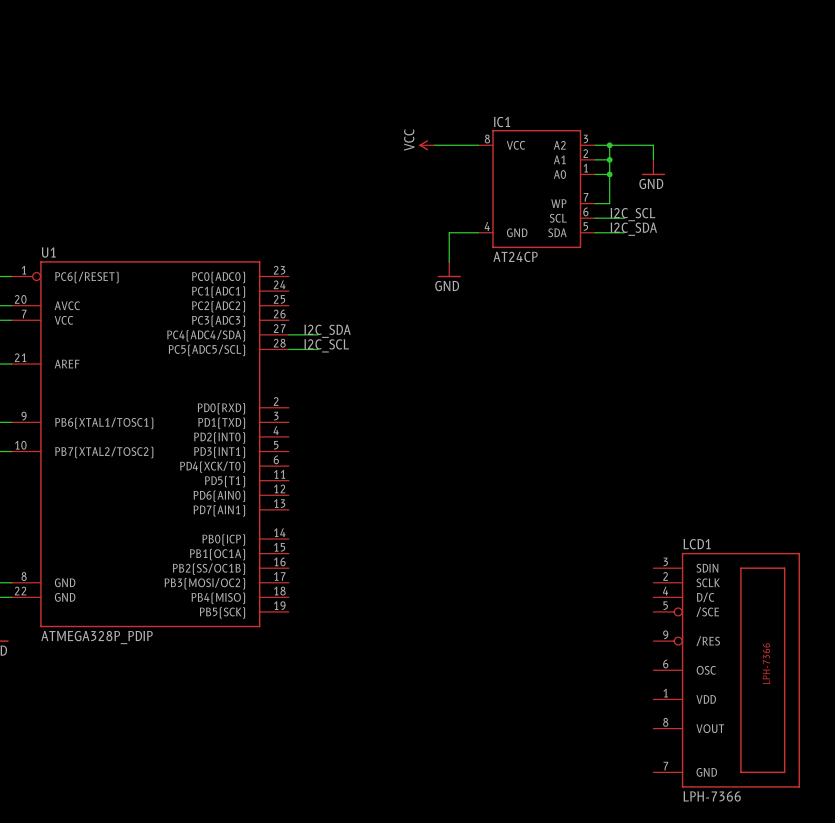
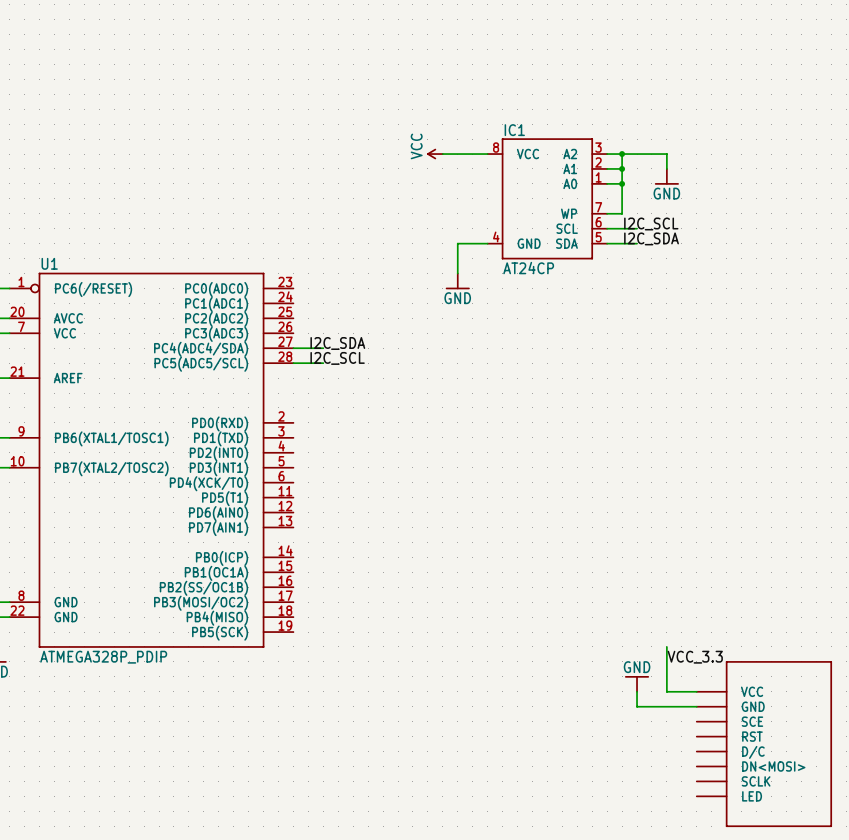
wire: none -> (666, 646) (666, 691) (696, 691)
label: none -> VCC_3.3 (695, 657)
power symbol: none -> GND (637, 683)
wire: none -> (637, 691) (637, 706) (696, 706)
LCD1: LPH-7366 (726, 670) -> none
part: none -> (764, 744)

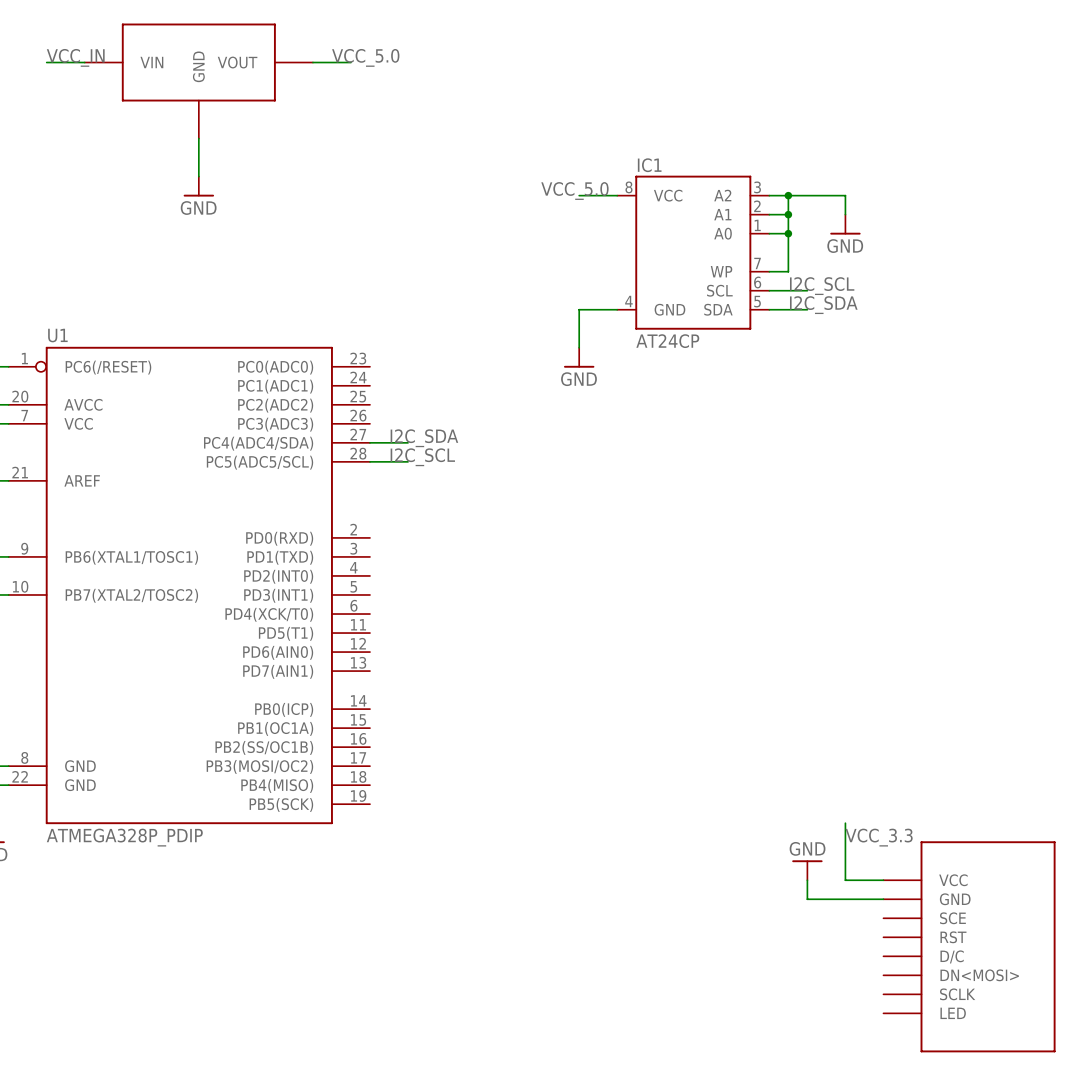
label: none -> VCC_IN (75, 57)
label: none -> VCC_5.0 (365, 57)
wire: none -> (46, 62) (84, 62)
wire: none -> (312, 62) (350, 62)
part: none -> (198, 81)
wire: none -> (198, 138) (198, 176)
power symbol: none -> GND (198, 186)
label: none -> VCC_5.0 (574, 191)
power symbol: VCC (434, 154) -> none
wire: (442, 154) (457, 154) -> none

